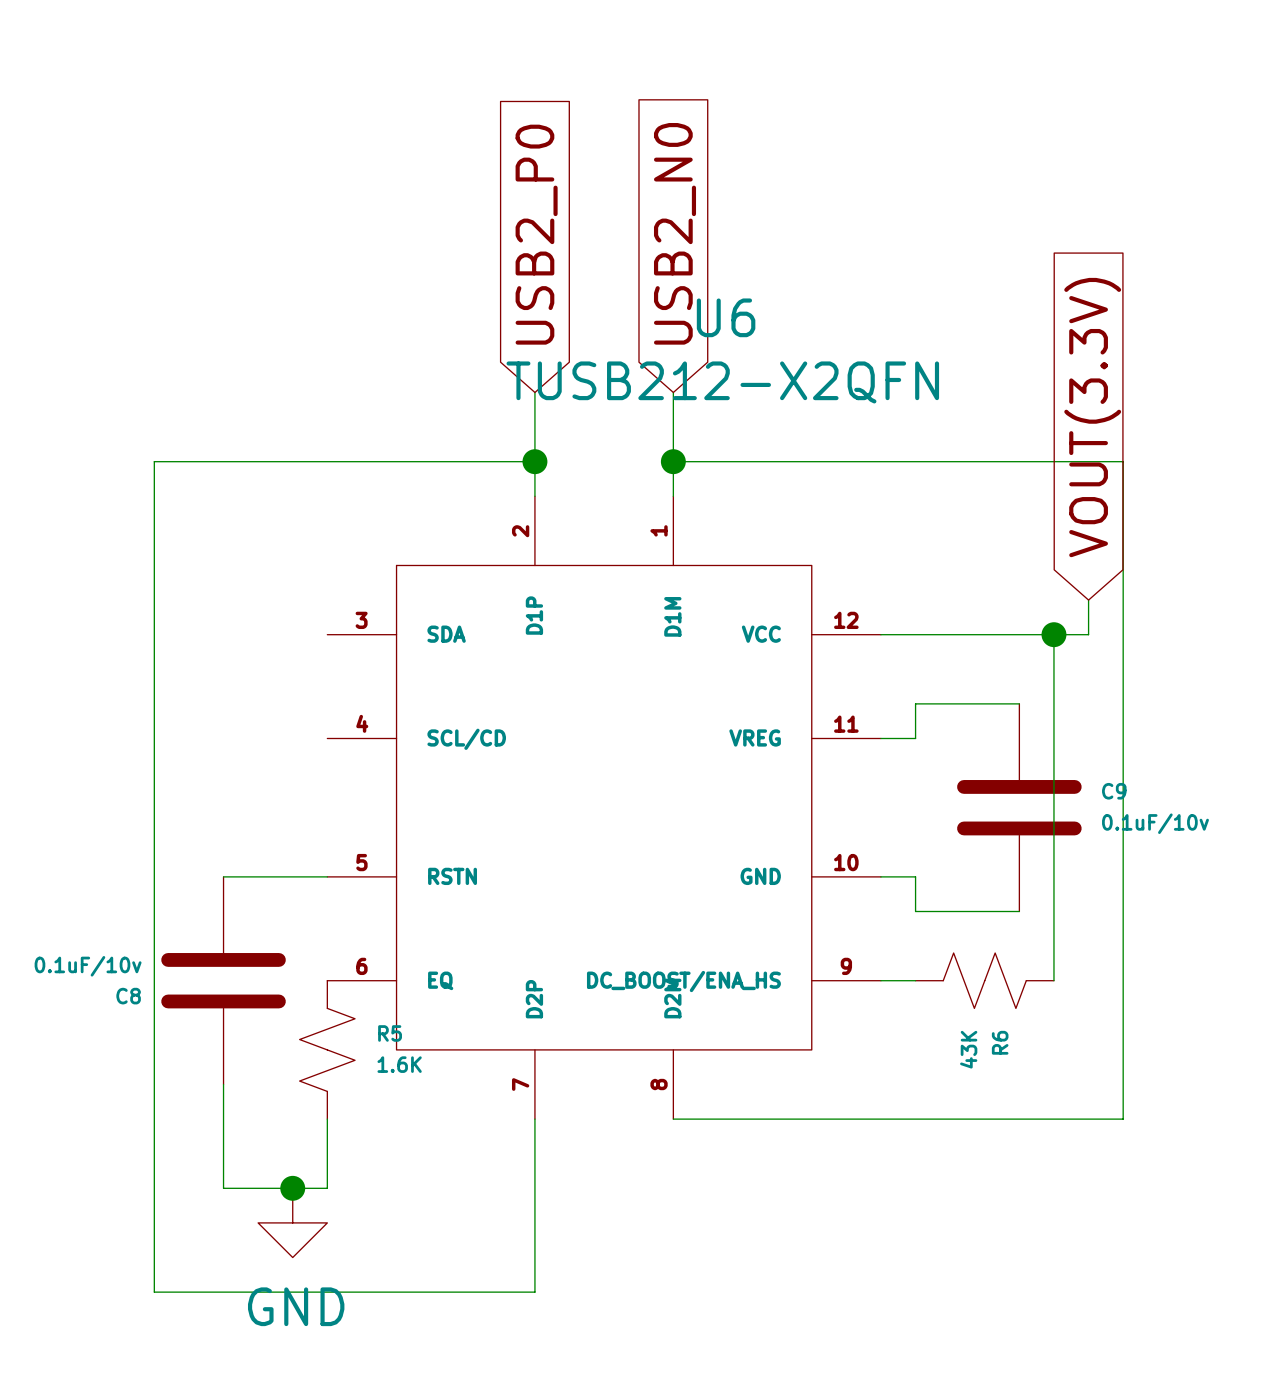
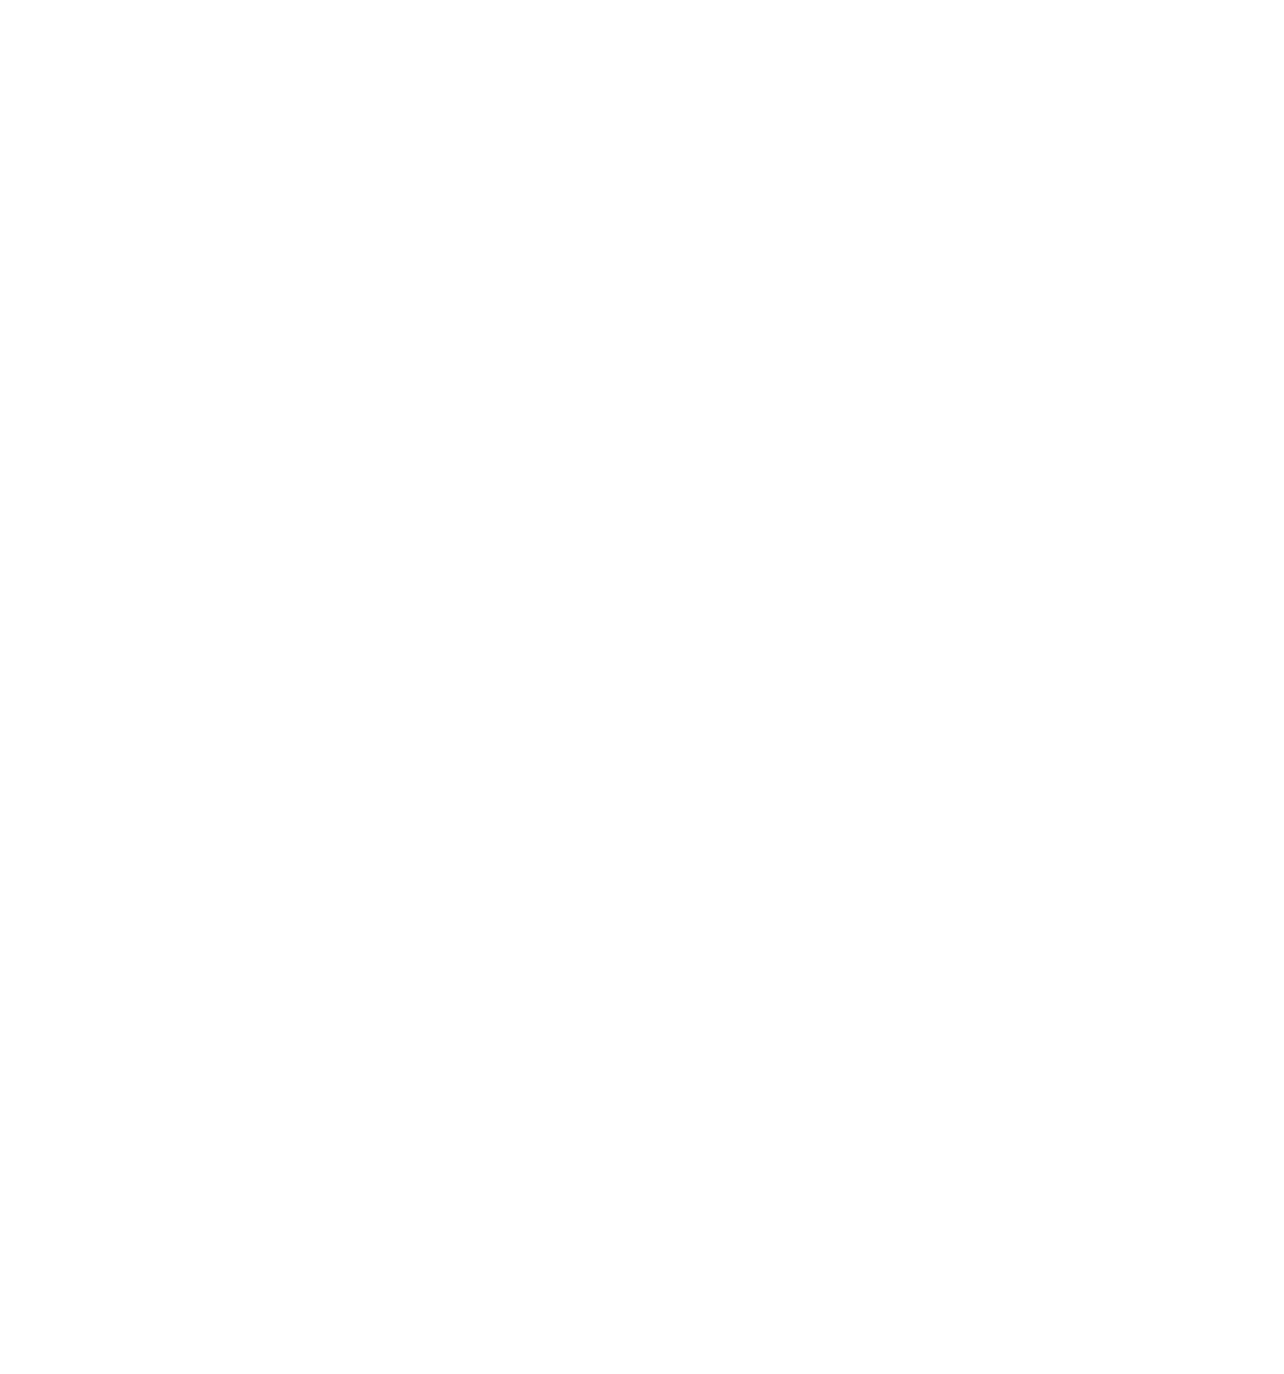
global label: USB2_N0 (675, 233) -> none
global label: USB2_P0 (536, 234) -> none
wire: (534, 392) (534, 496) -> none
wire: (673, 392) (673, 496) -> none
global label: VOUT(3.3V) (1092, 417) -> none
wire: (534, 461) (154, 461) (154, 1292) (534, 1292) (534, 1119) -> none
junction: (534, 461) -> none
wire: (673, 461) (1123, 461) (1123, 1119) (673, 1119) -> none
junction: (673, 461) -> none
wire: (1088, 600) (1088, 634) (880, 634) -> none
wire: (1053, 634) (1053, 980) -> none
junction: (1053, 634) -> none
wire: (1019, 703) (915, 703) (915, 738) (880, 738) -> none
U6: TUSB212-X2QFN (604, 807) -> none
C9: 0.1uF/10v (1019, 807) -> none
wire: (223, 876) (327, 876) -> none
wire: (880, 876) (915, 876) (915, 911) (1019, 911) -> none
C8: 0.1uF/10v (223, 980) -> none
wire: (880, 980) (915, 980) -> none
R6: 43K (984, 980) -> none
R5: 1.6K (327, 1049) -> none
wire: (223, 1084) (223, 1188) (327, 1188) (327, 1119) -> none
junction: (292, 1188) -> none
power symbol: GND (292, 1222) -> none

